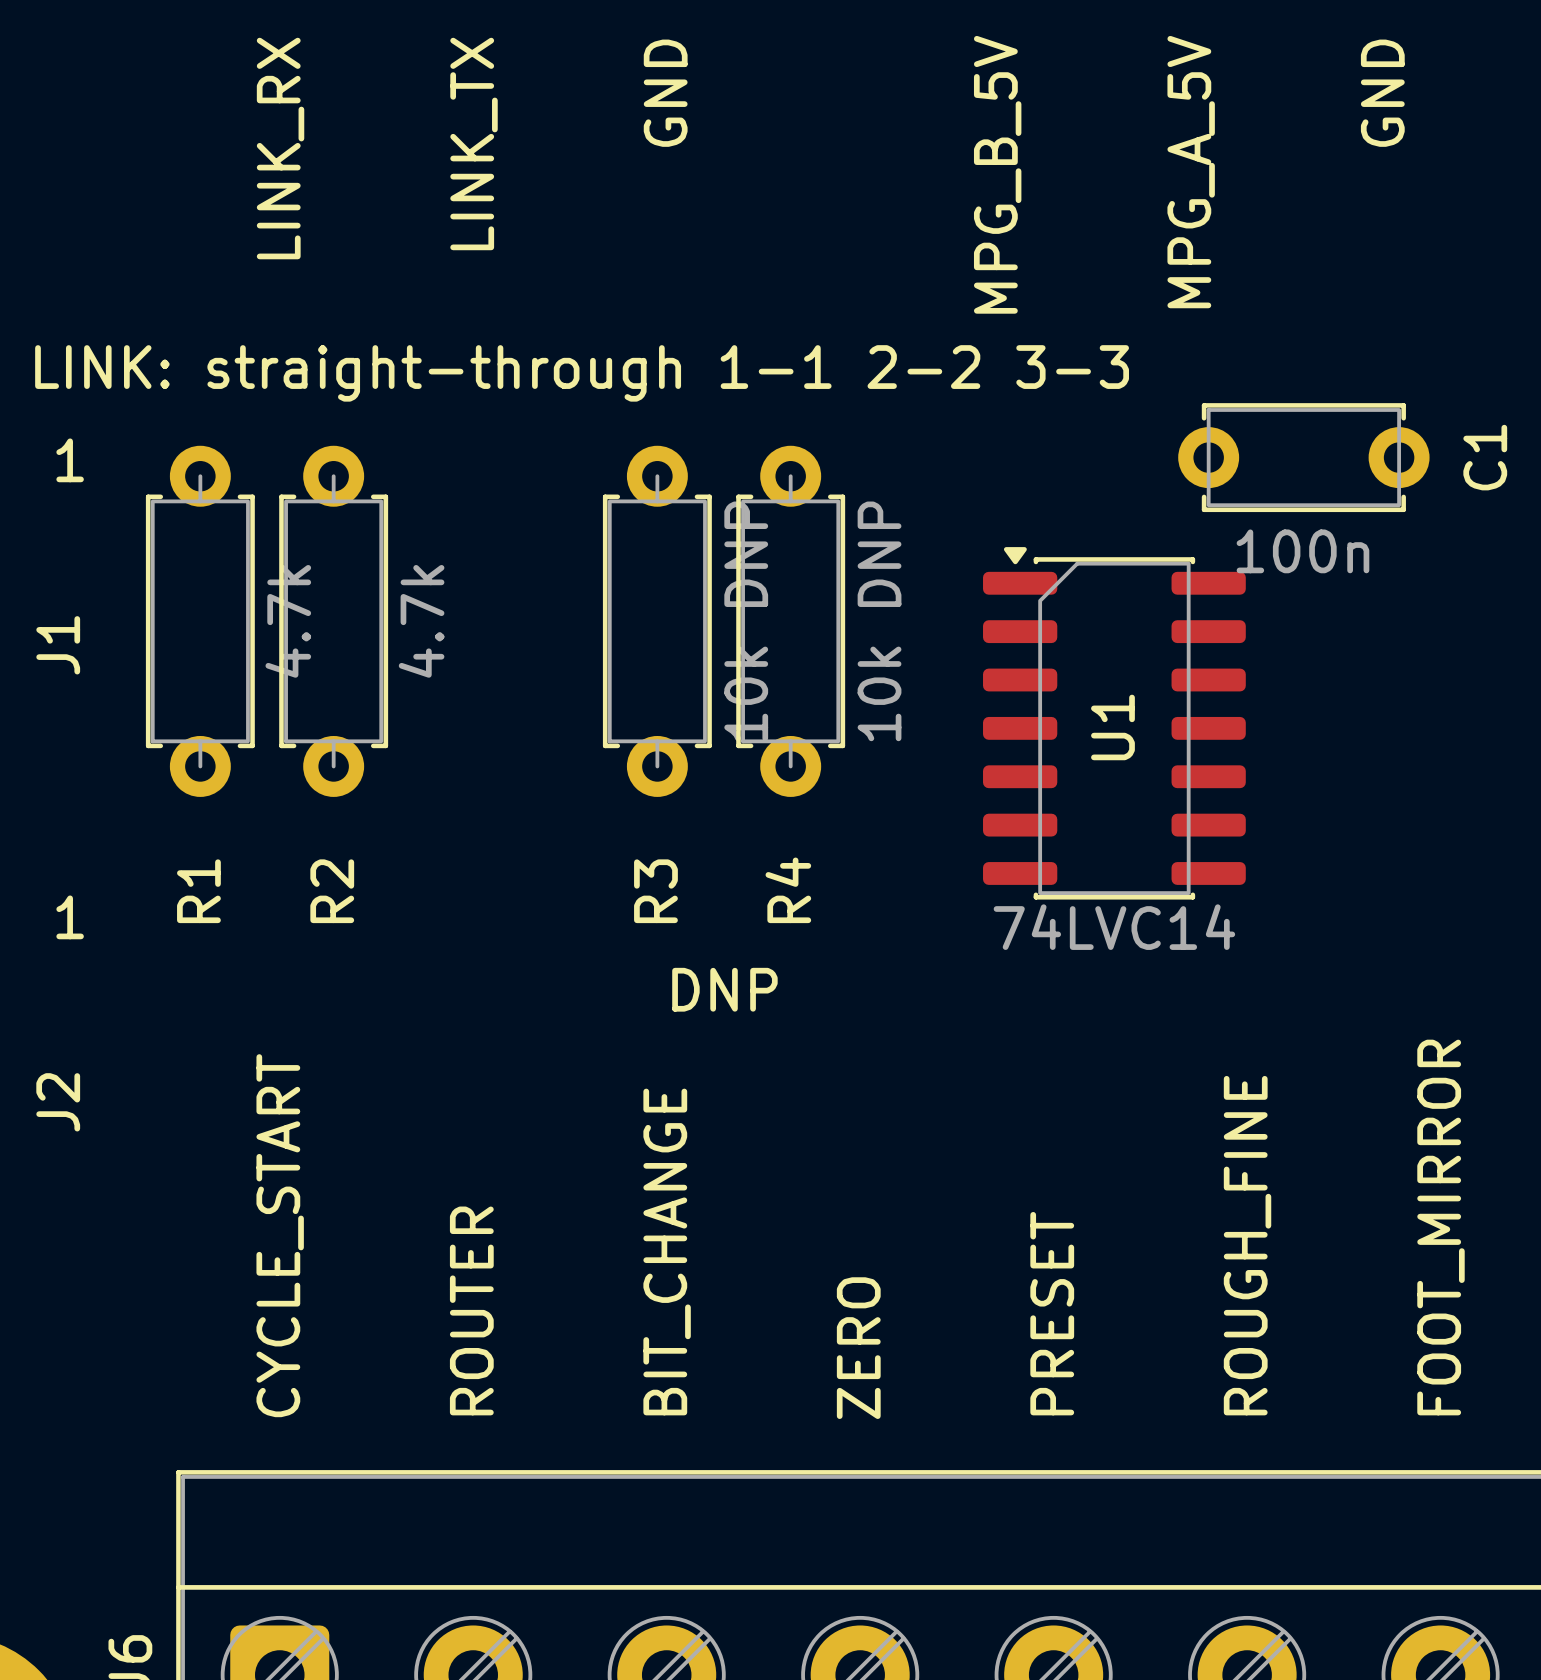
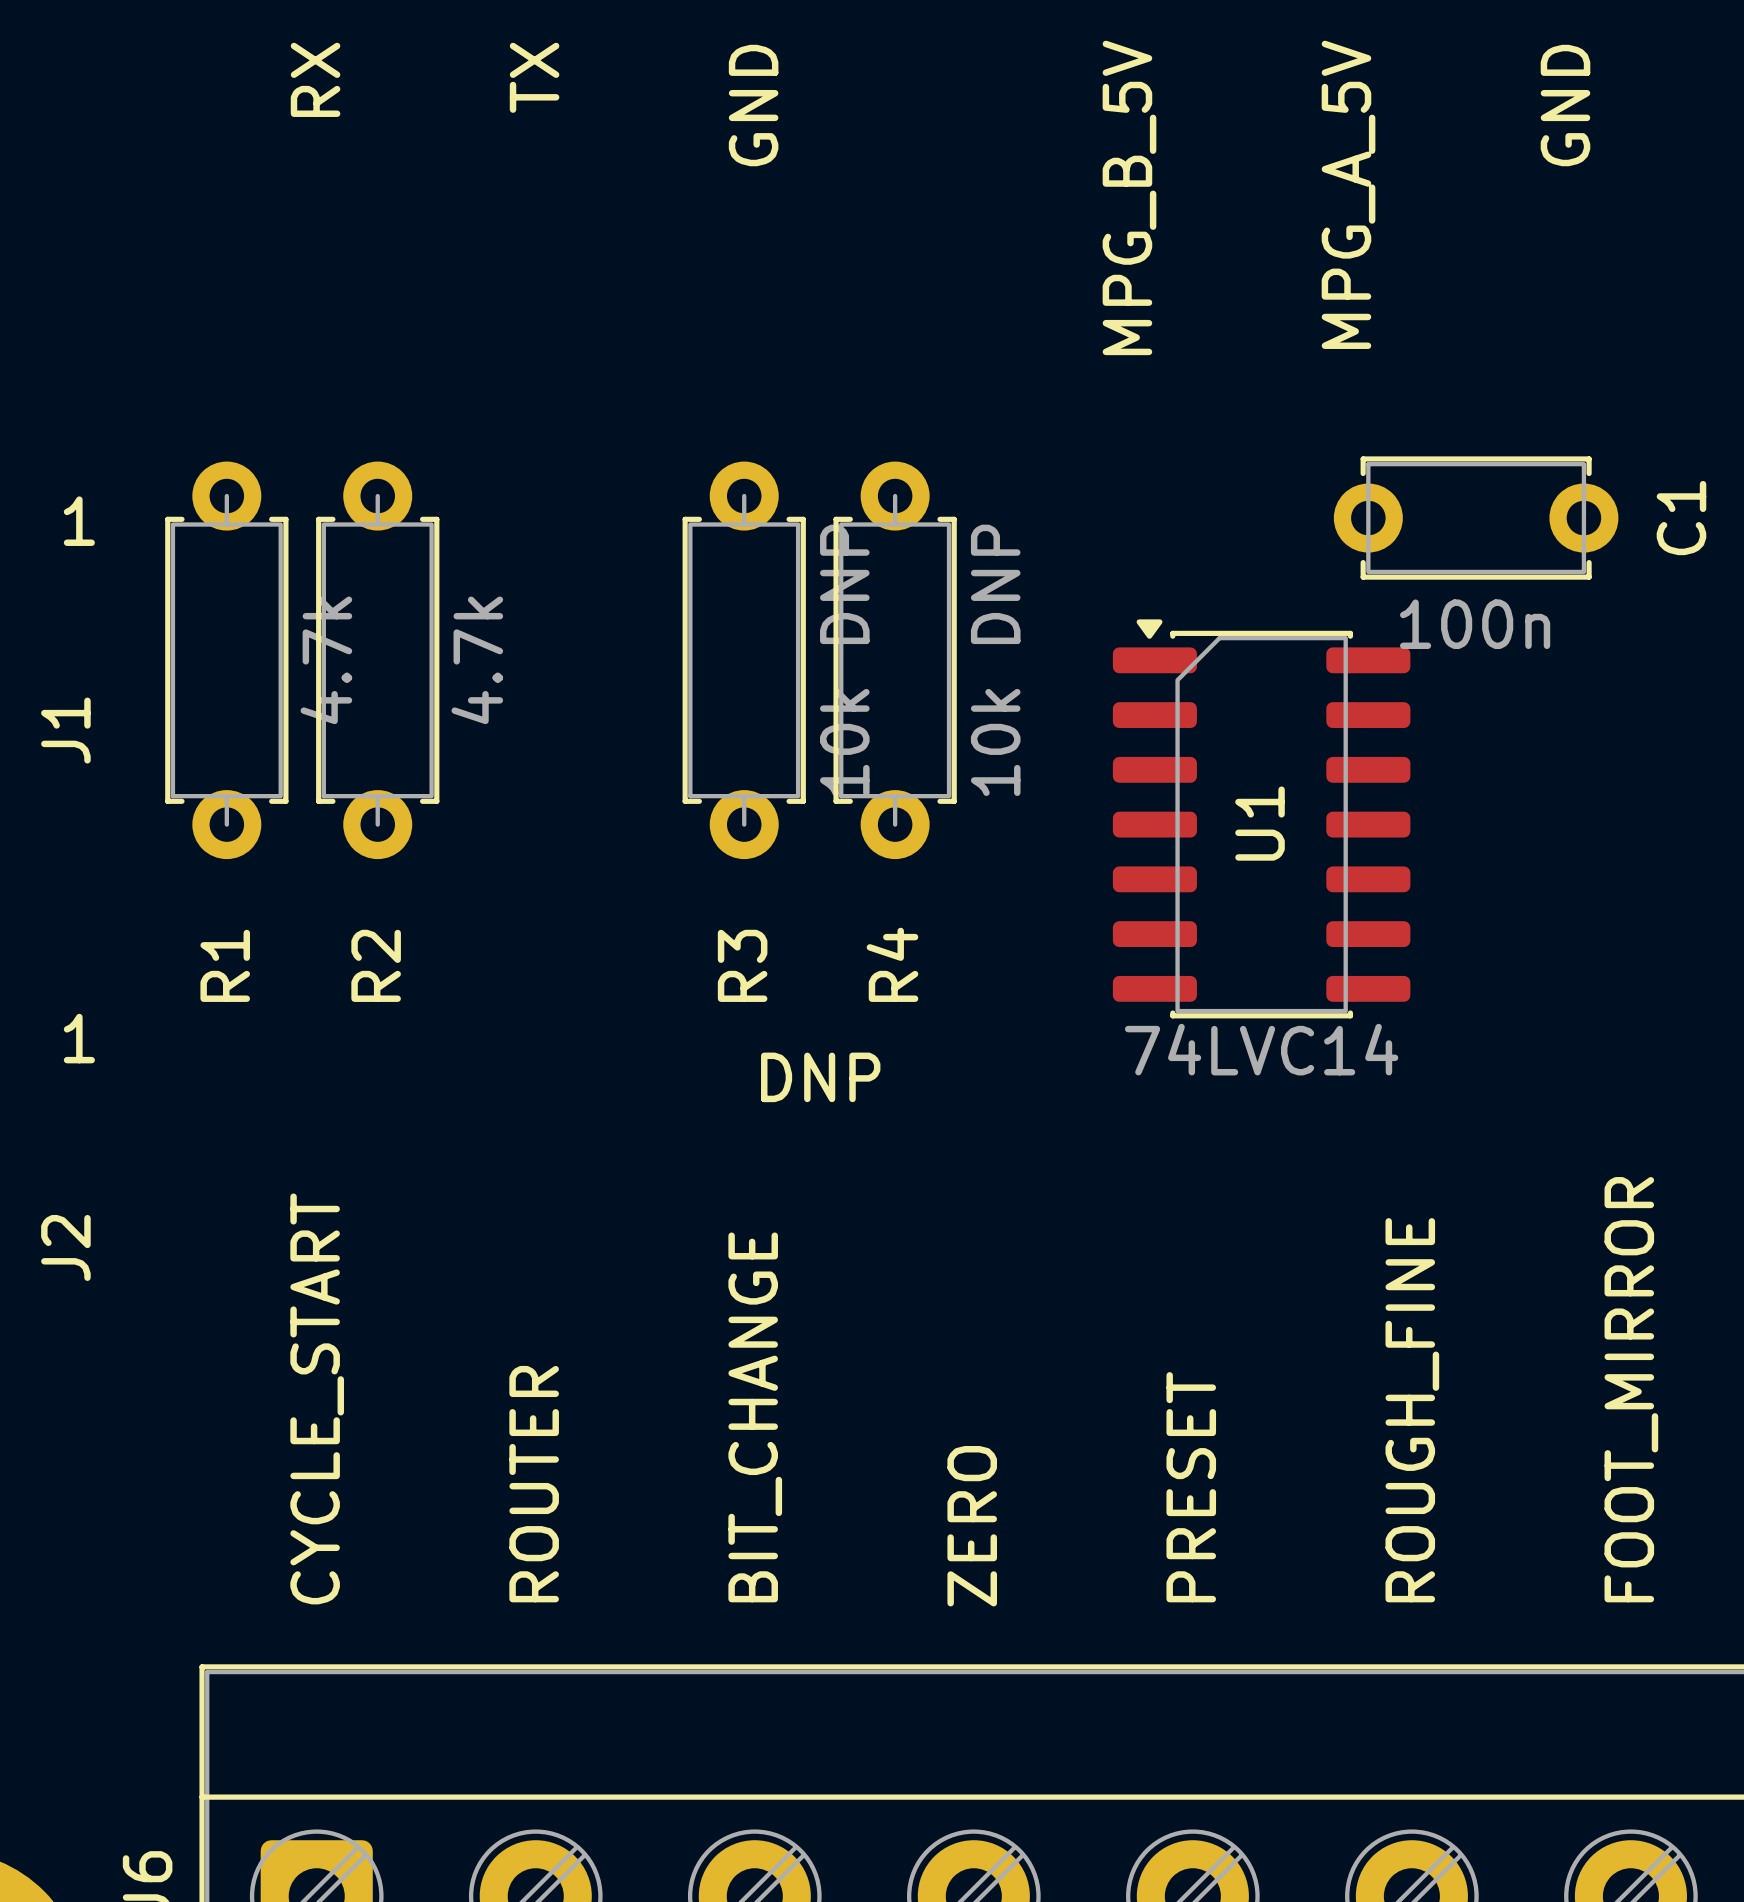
text: LINK_TX (474, 143) -> TX (534, 77)
text: LINK_RX (280, 148) -> RX (315, 79)
text: LINK: straight-through 1-1 2-2 3-3 (582, 373) -> none
R1 position: (200, 621) -> (226, 660)
R2 position: (333, 621) -> (377, 660)
R3 position: (657, 621) -> (744, 660)
R4 position: (790, 621) -> (895, 660)
text position: DNP (724, 989) -> DNP (820, 1077)

